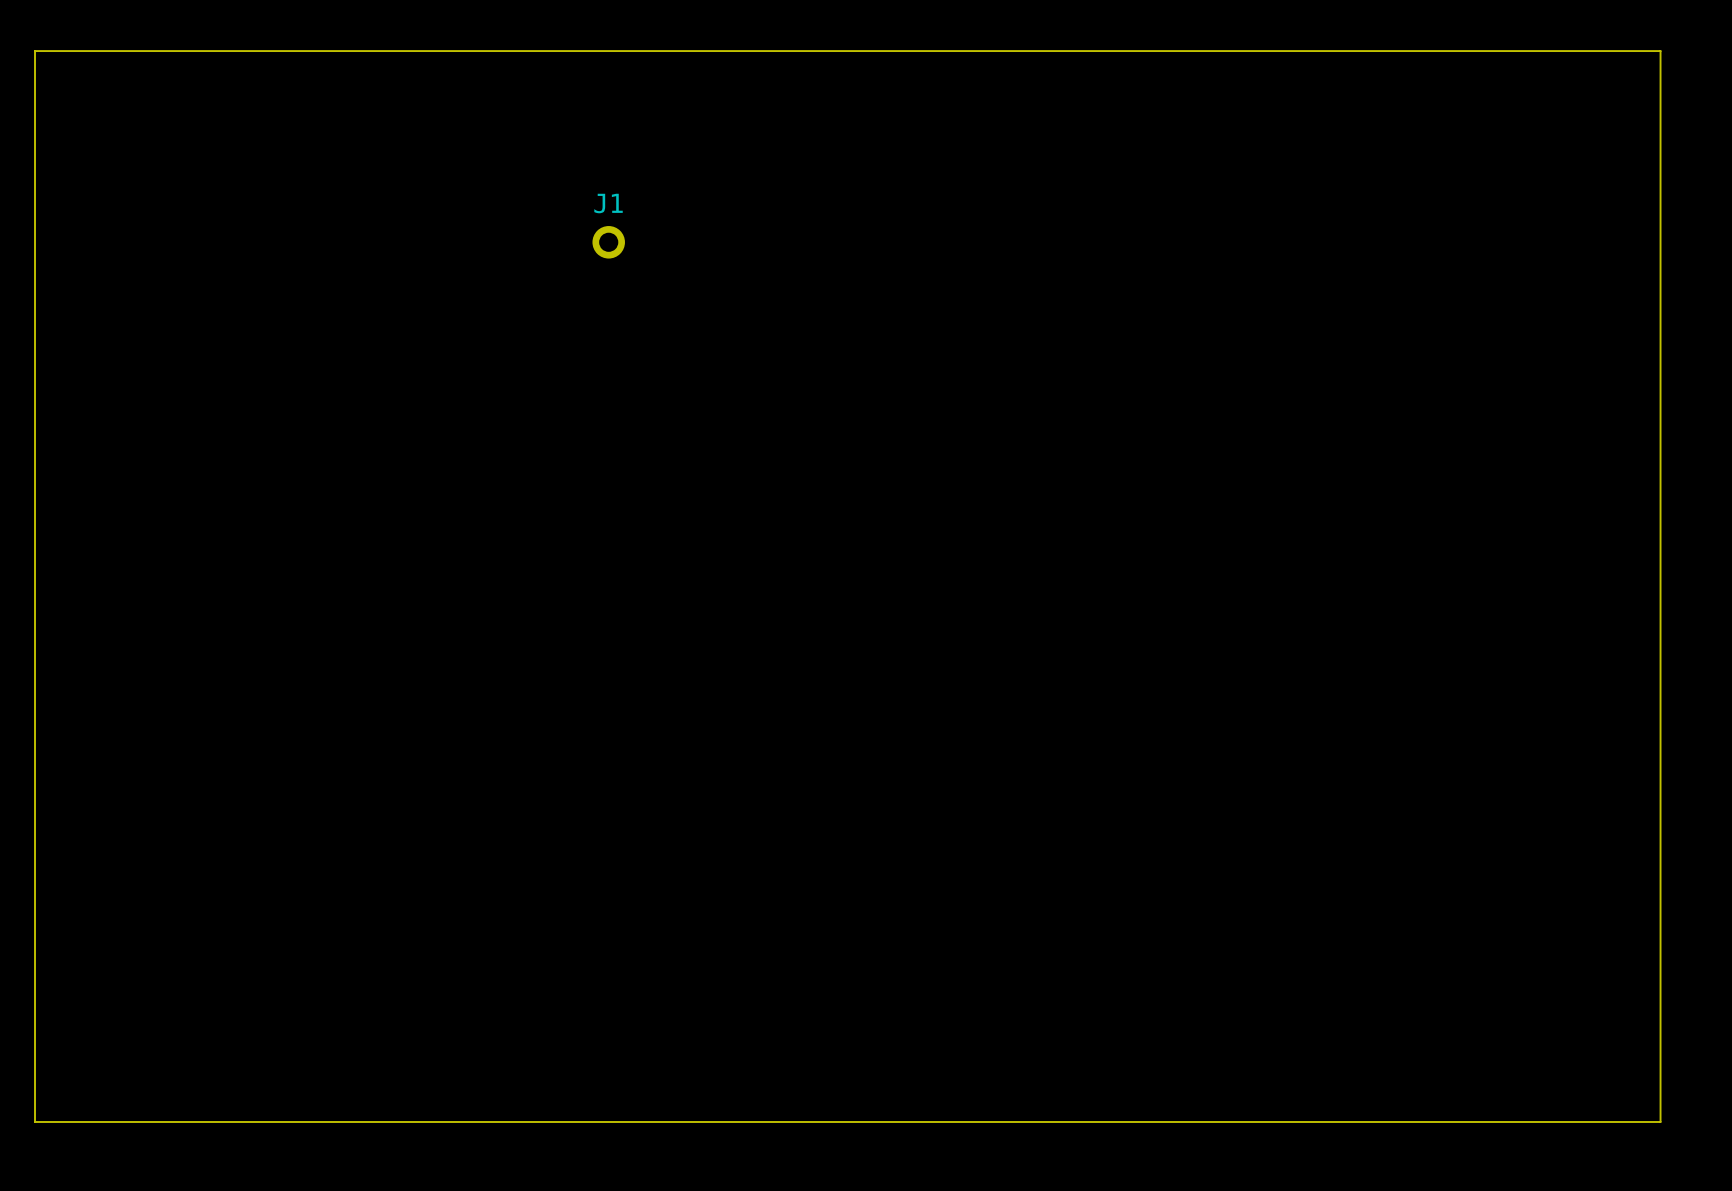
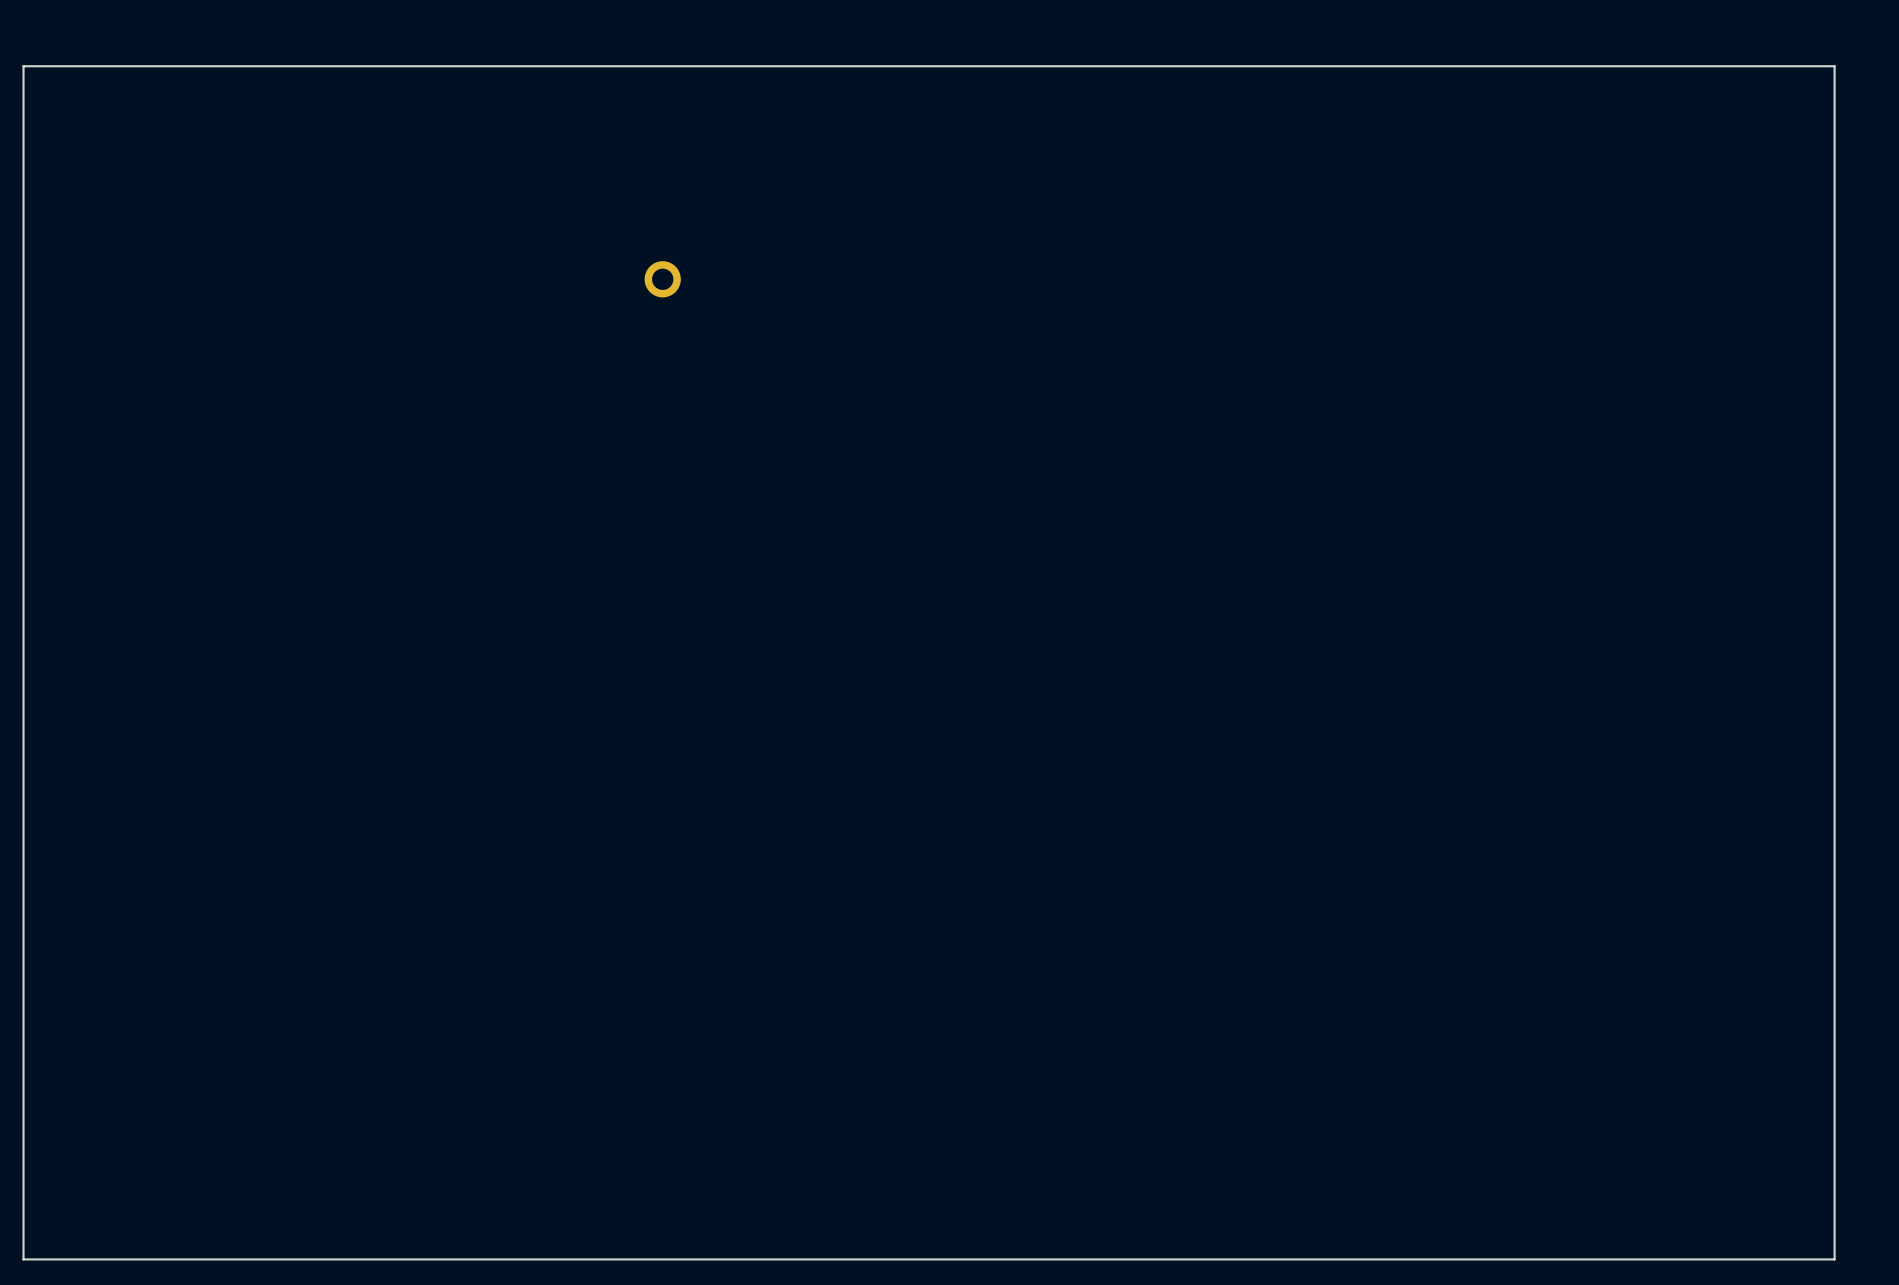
J1 name: J1 (608, 203) -> none

